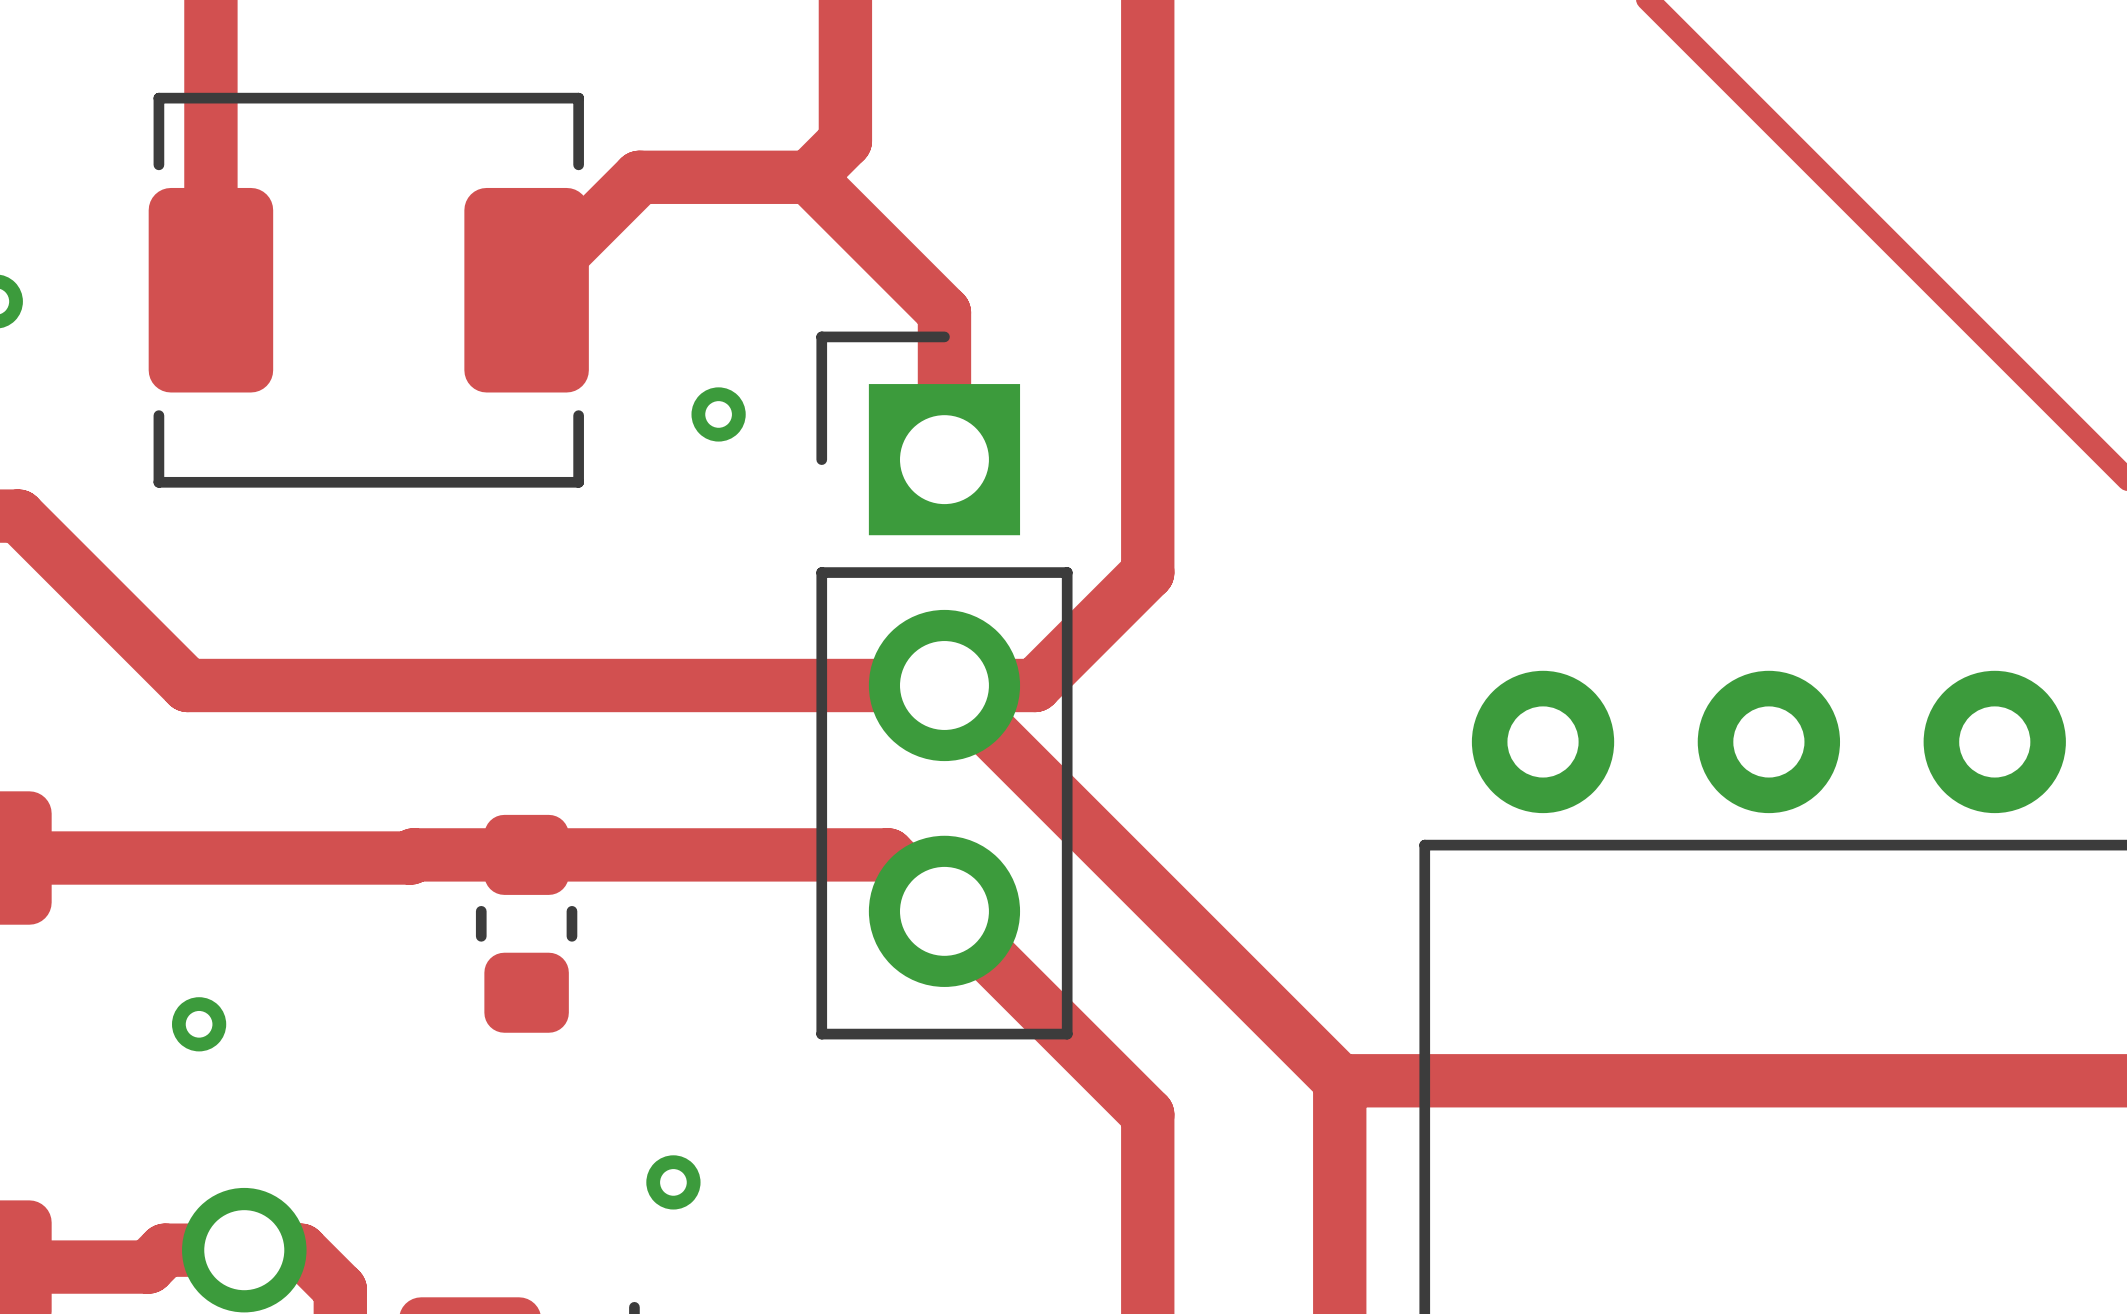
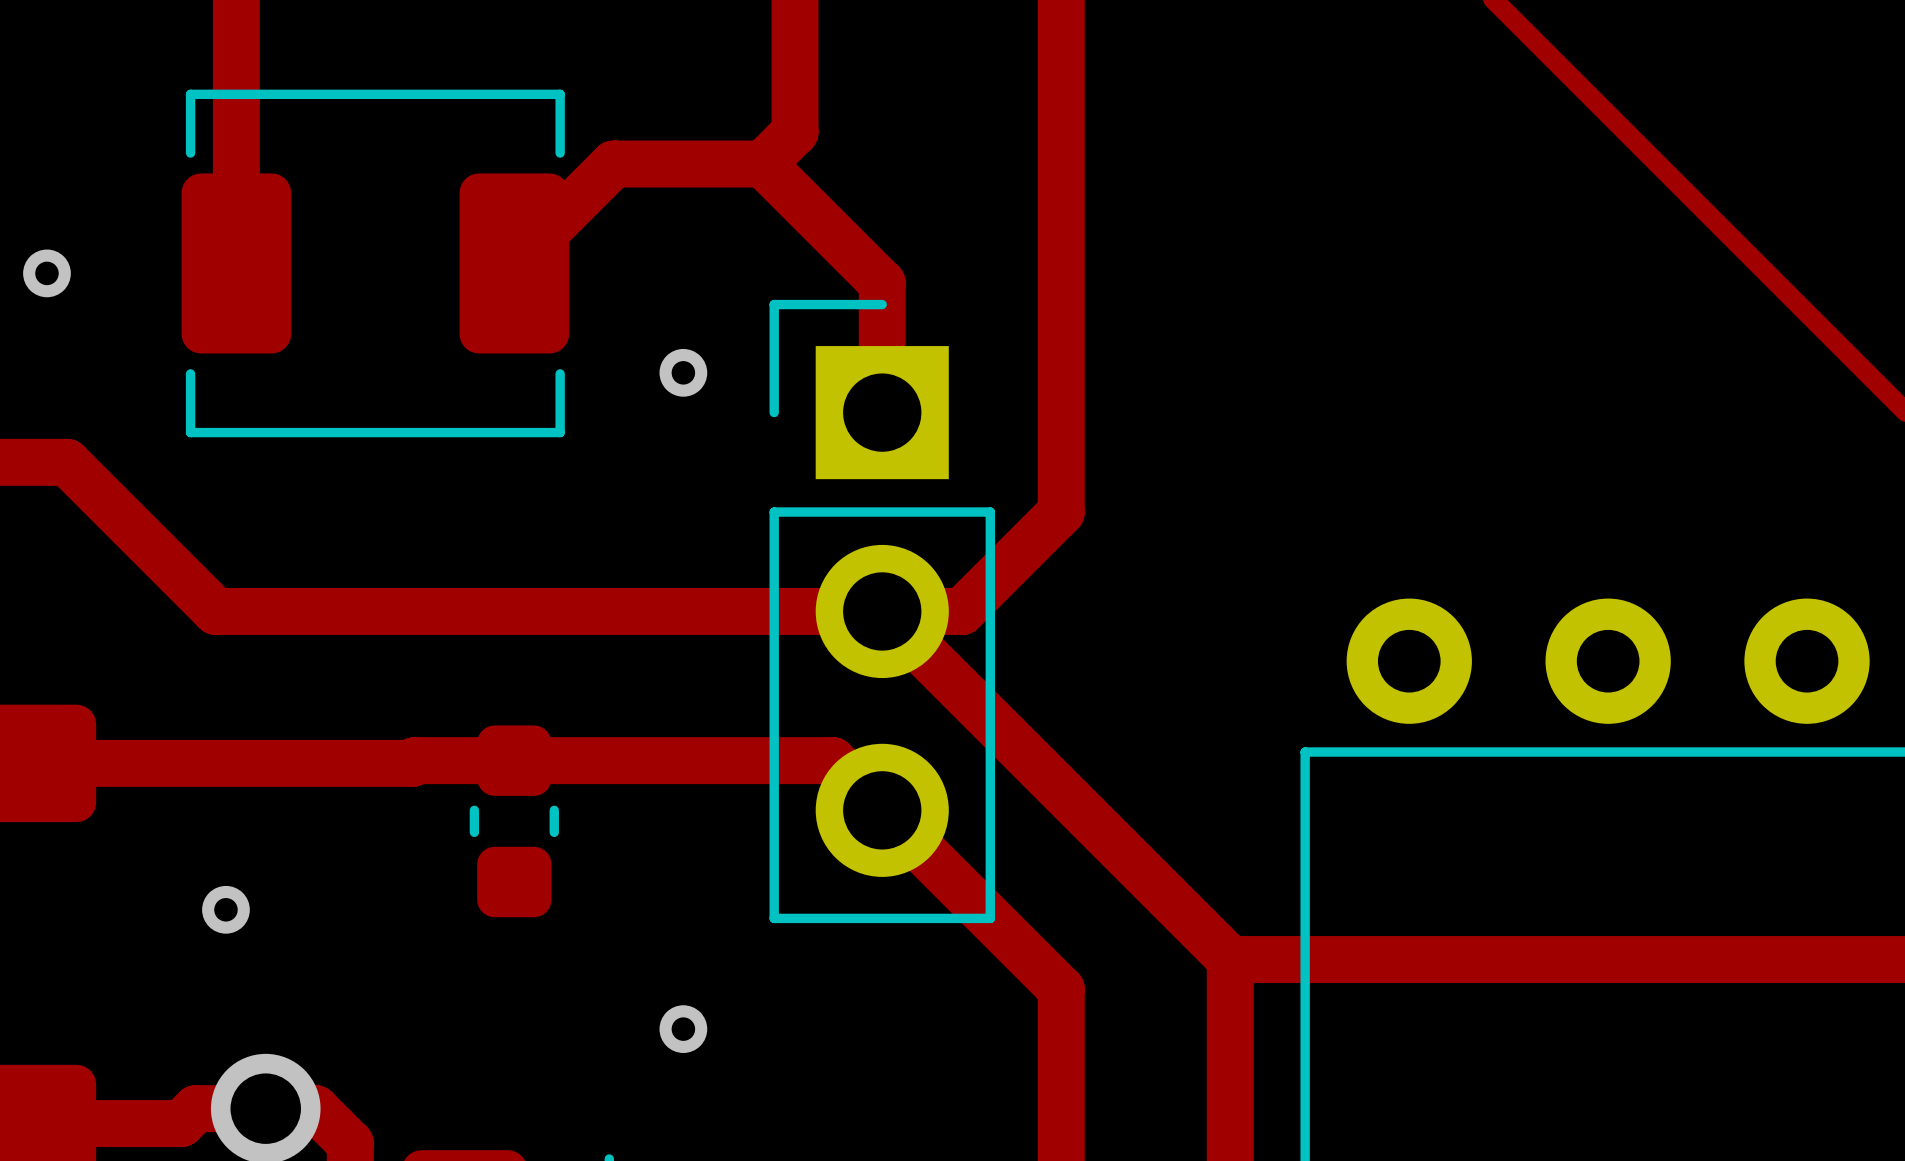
via position: (673, 1182) -> (683, 1029)

